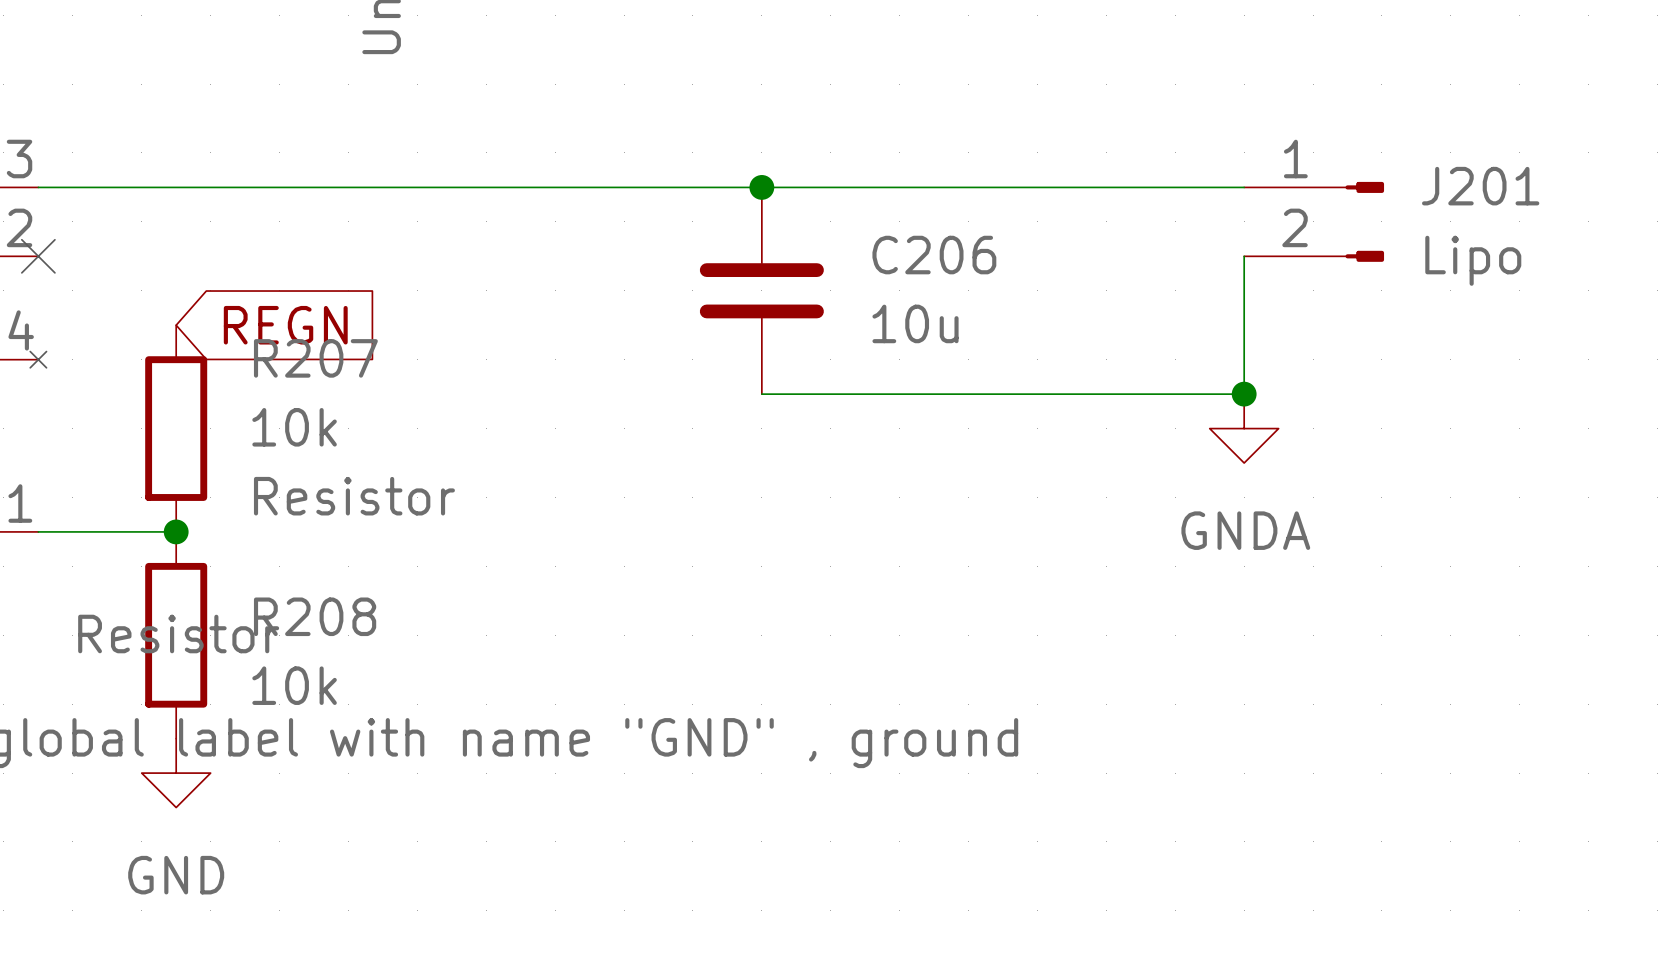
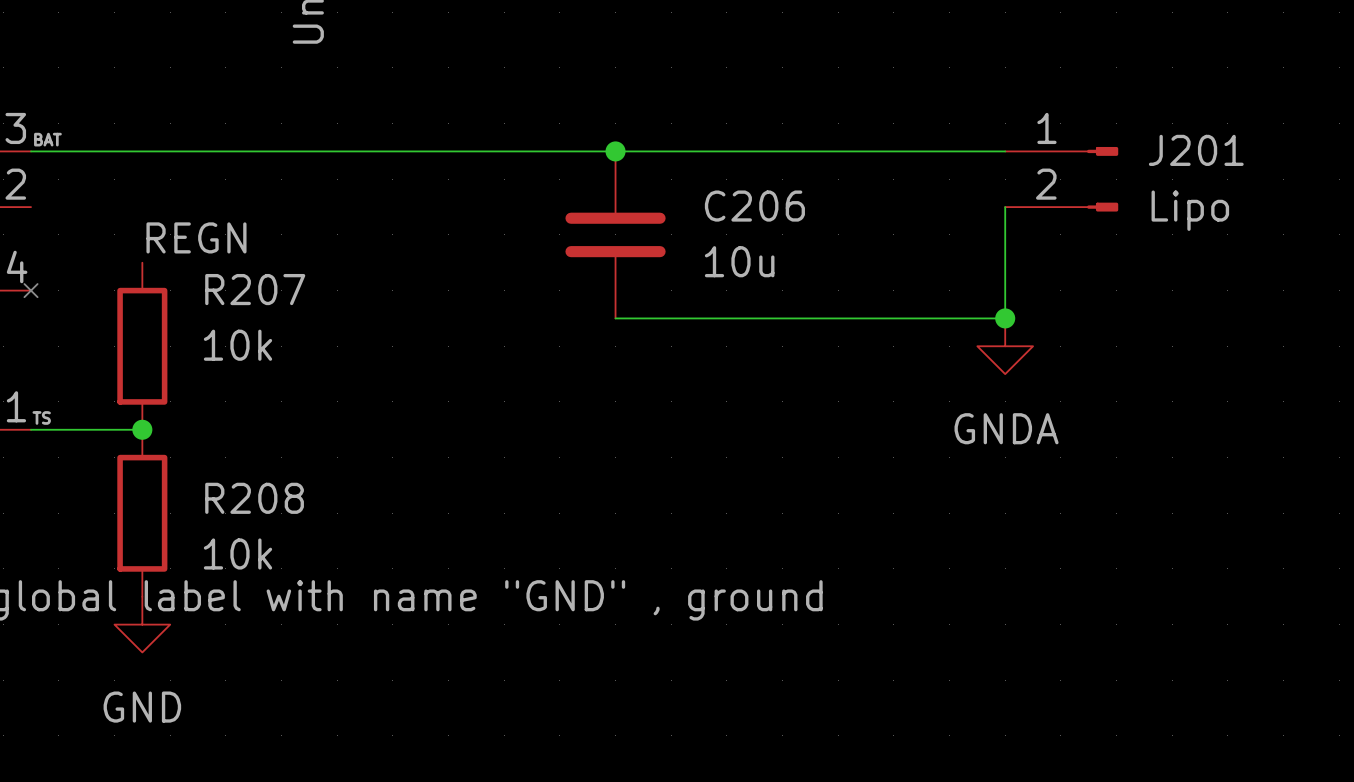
label: none -> BAT (47, 139)
no-connect mark: (38, 256) -> none
label: none -> REGN (196, 237)
global label: REGN (285, 325) -> none
R207 text: Resistor (354, 496) -> none
label: none -> TS (41, 417)
R208 text: Resistor (178, 634) -> none

